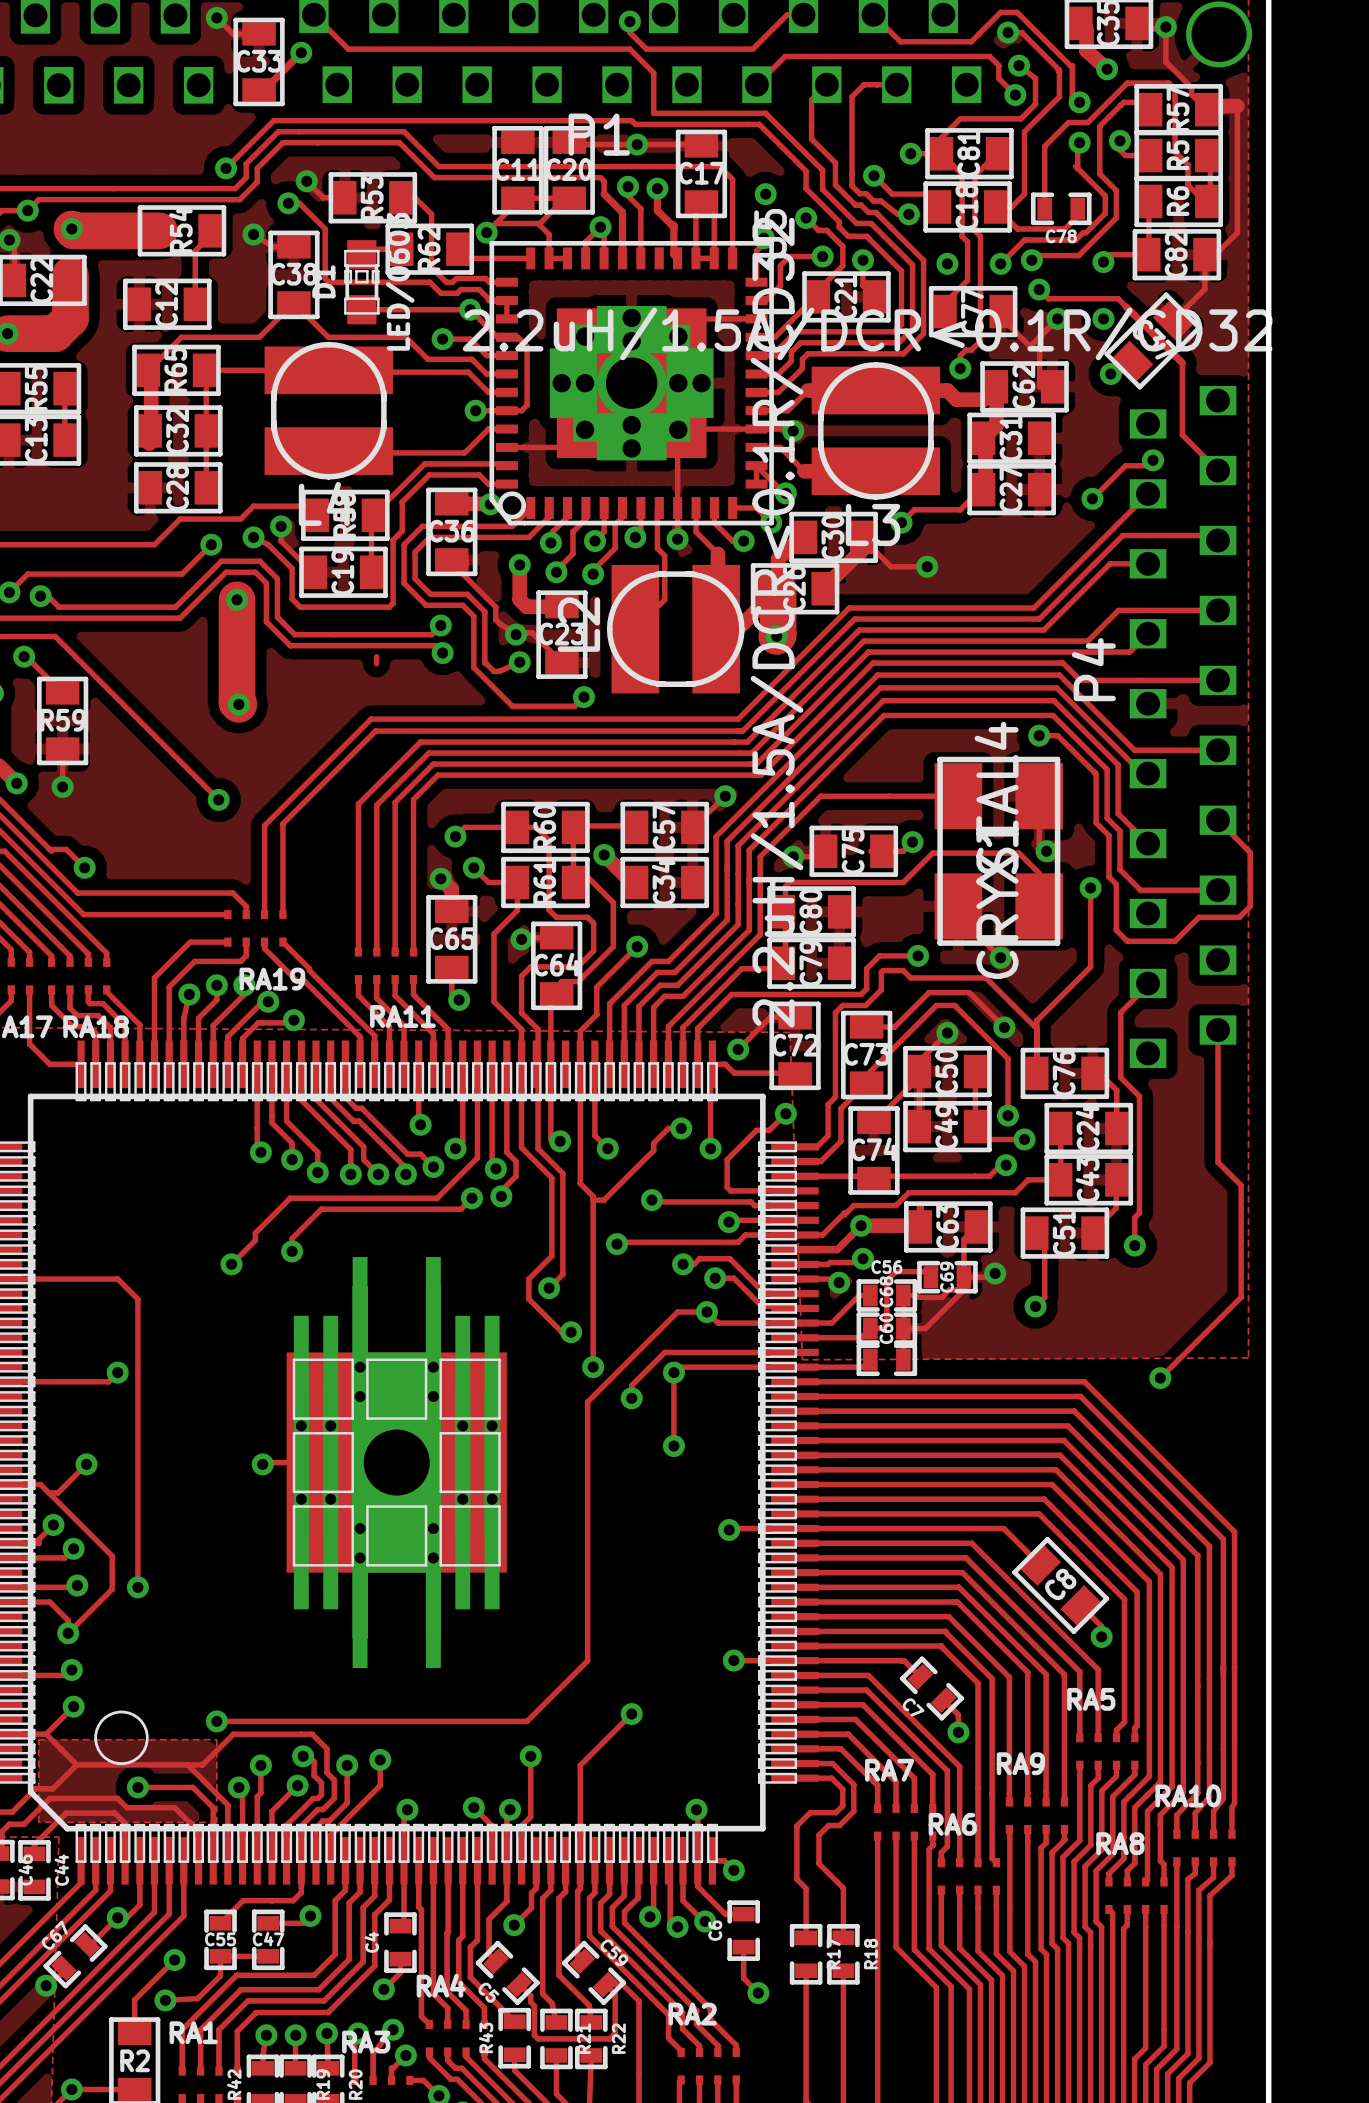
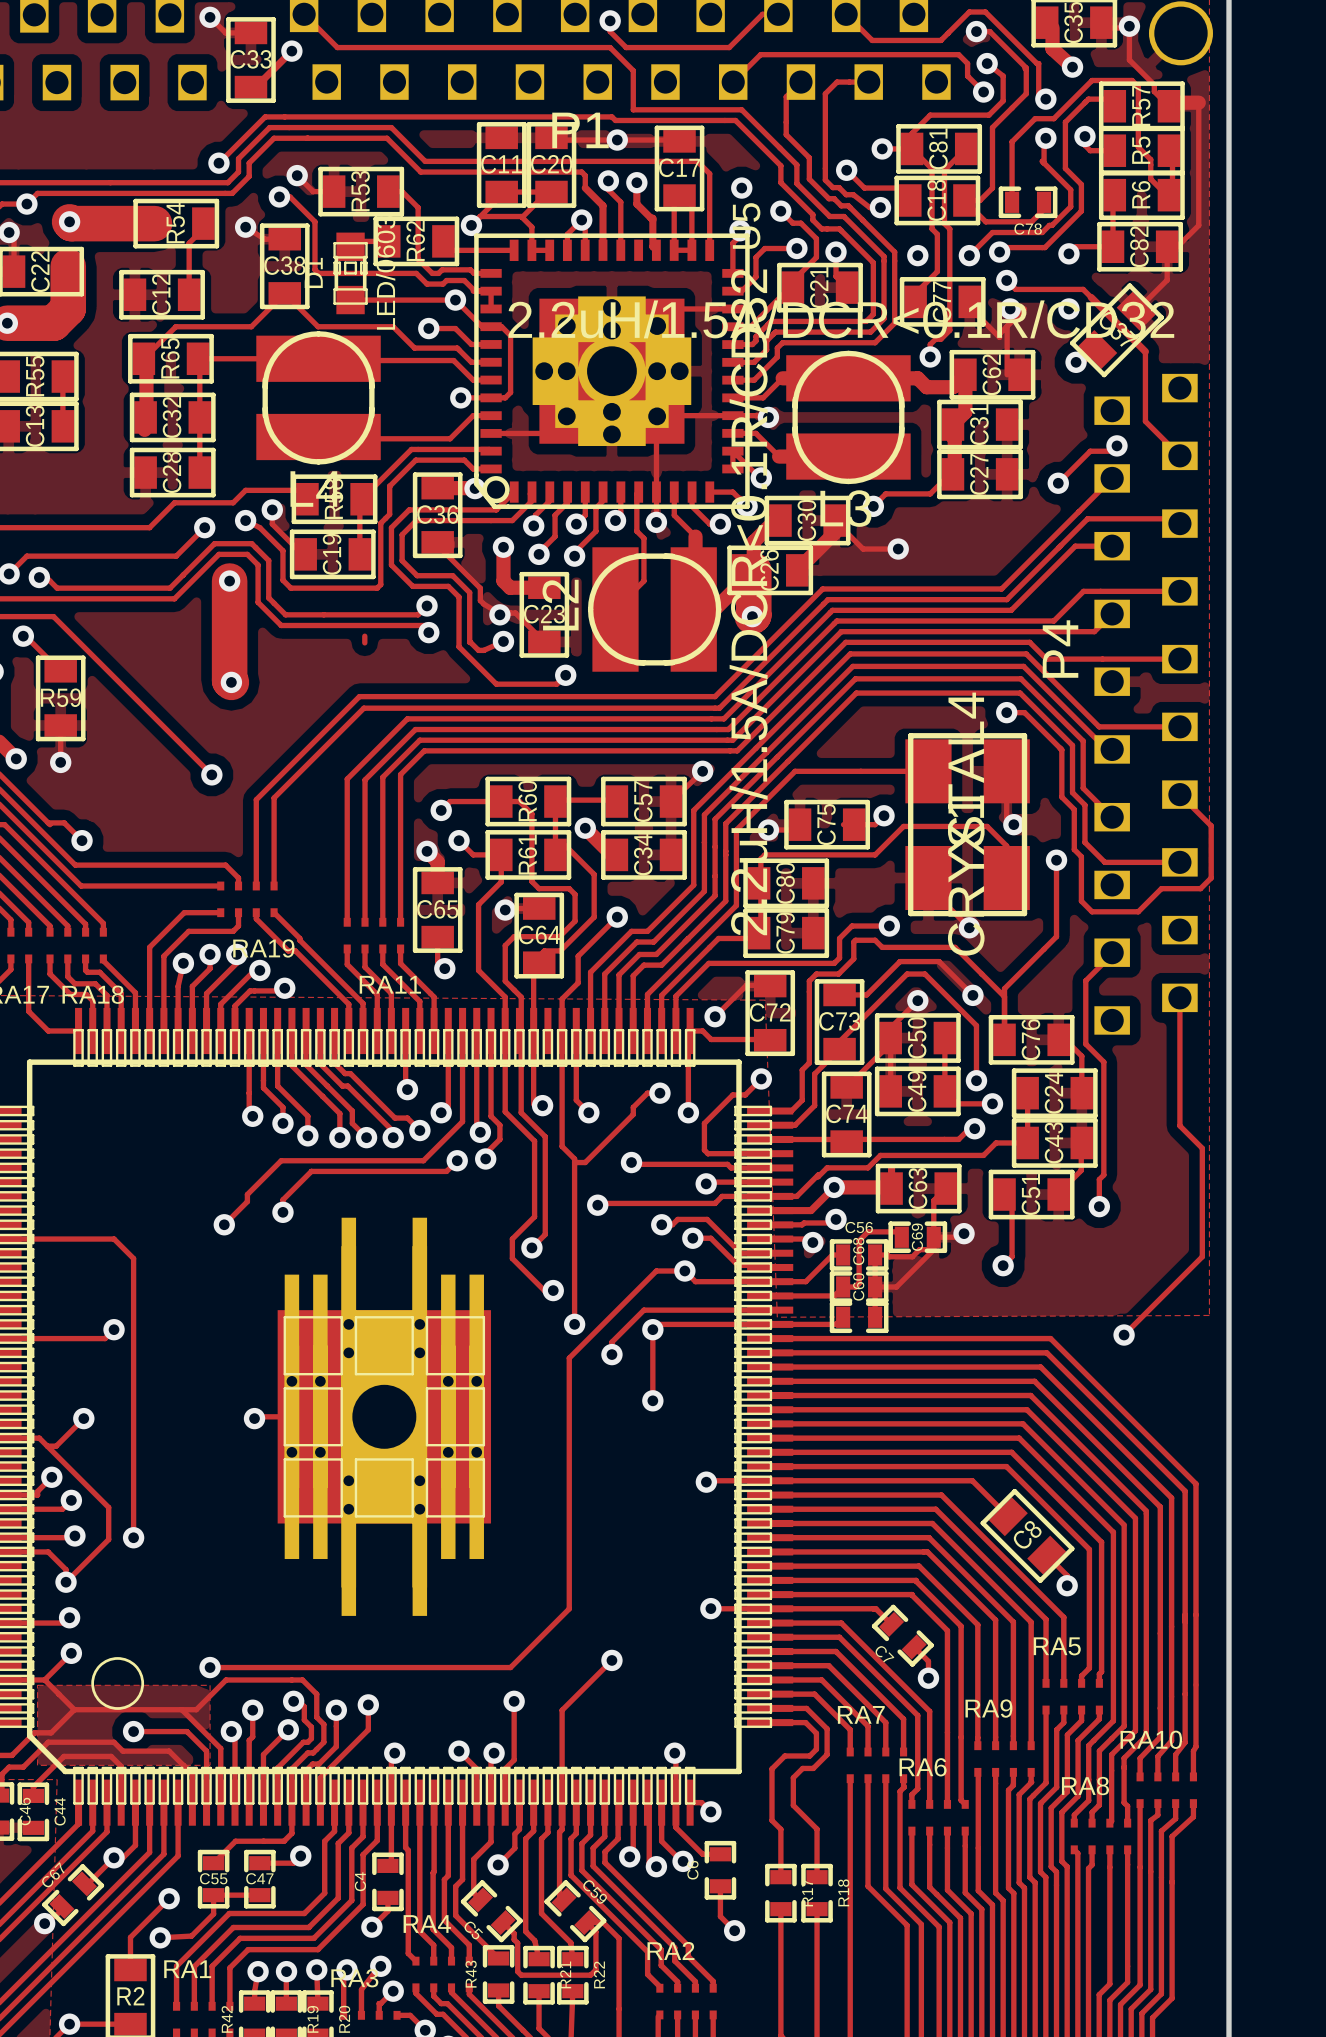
via position: (1057, 318) -> (1010, 308)

